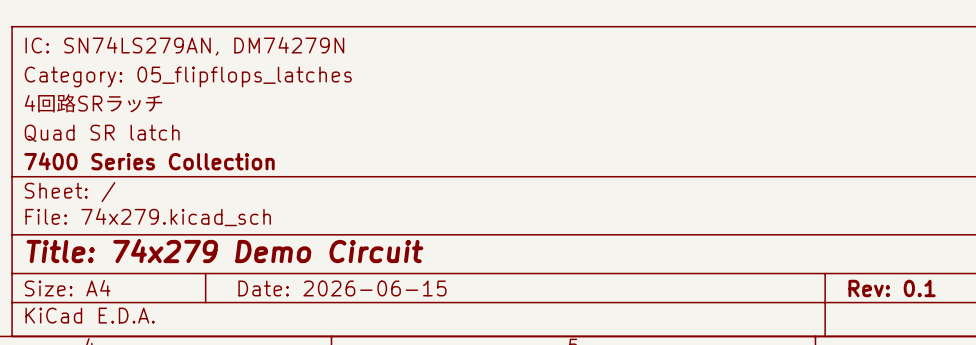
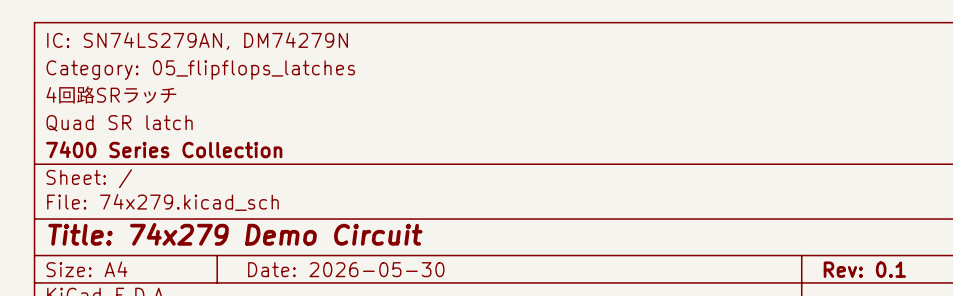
title block: Date: 2026-06-15 (342, 288) -> Date: 2026-05-30 (346, 269)

